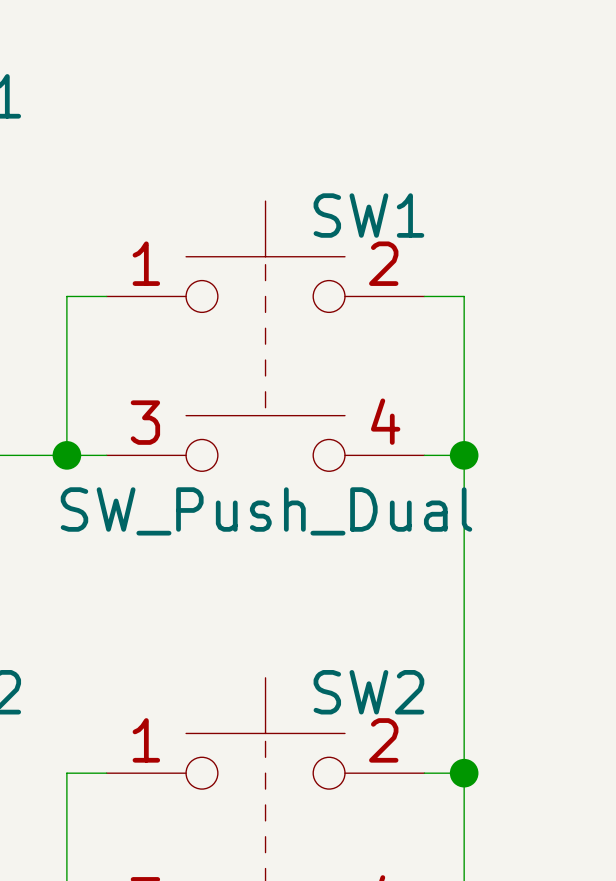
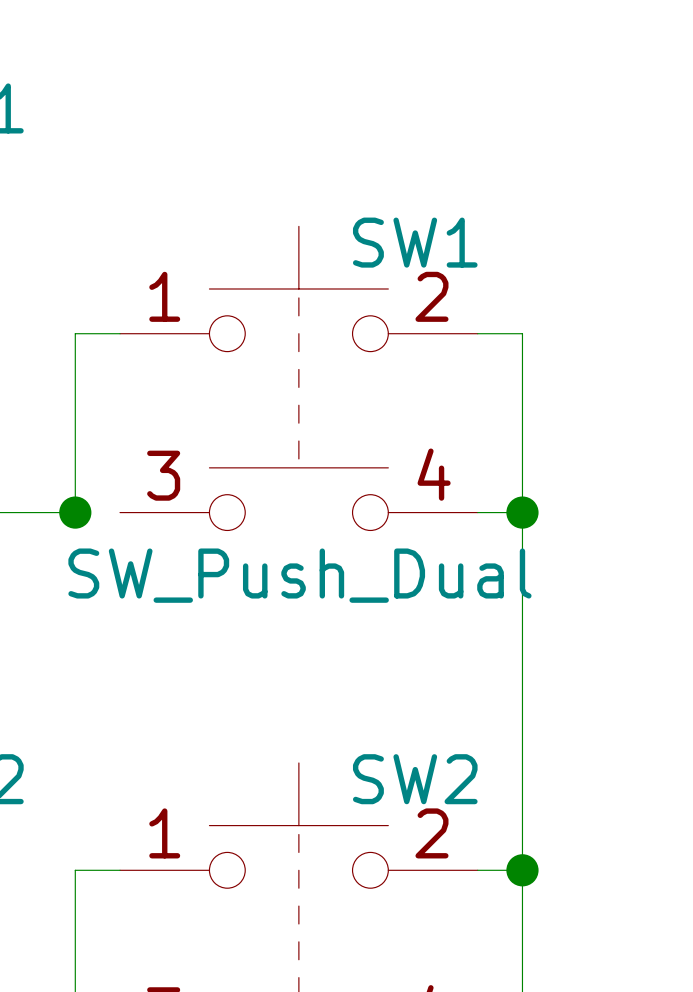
wire: (66, 455) (106, 455) -> none

